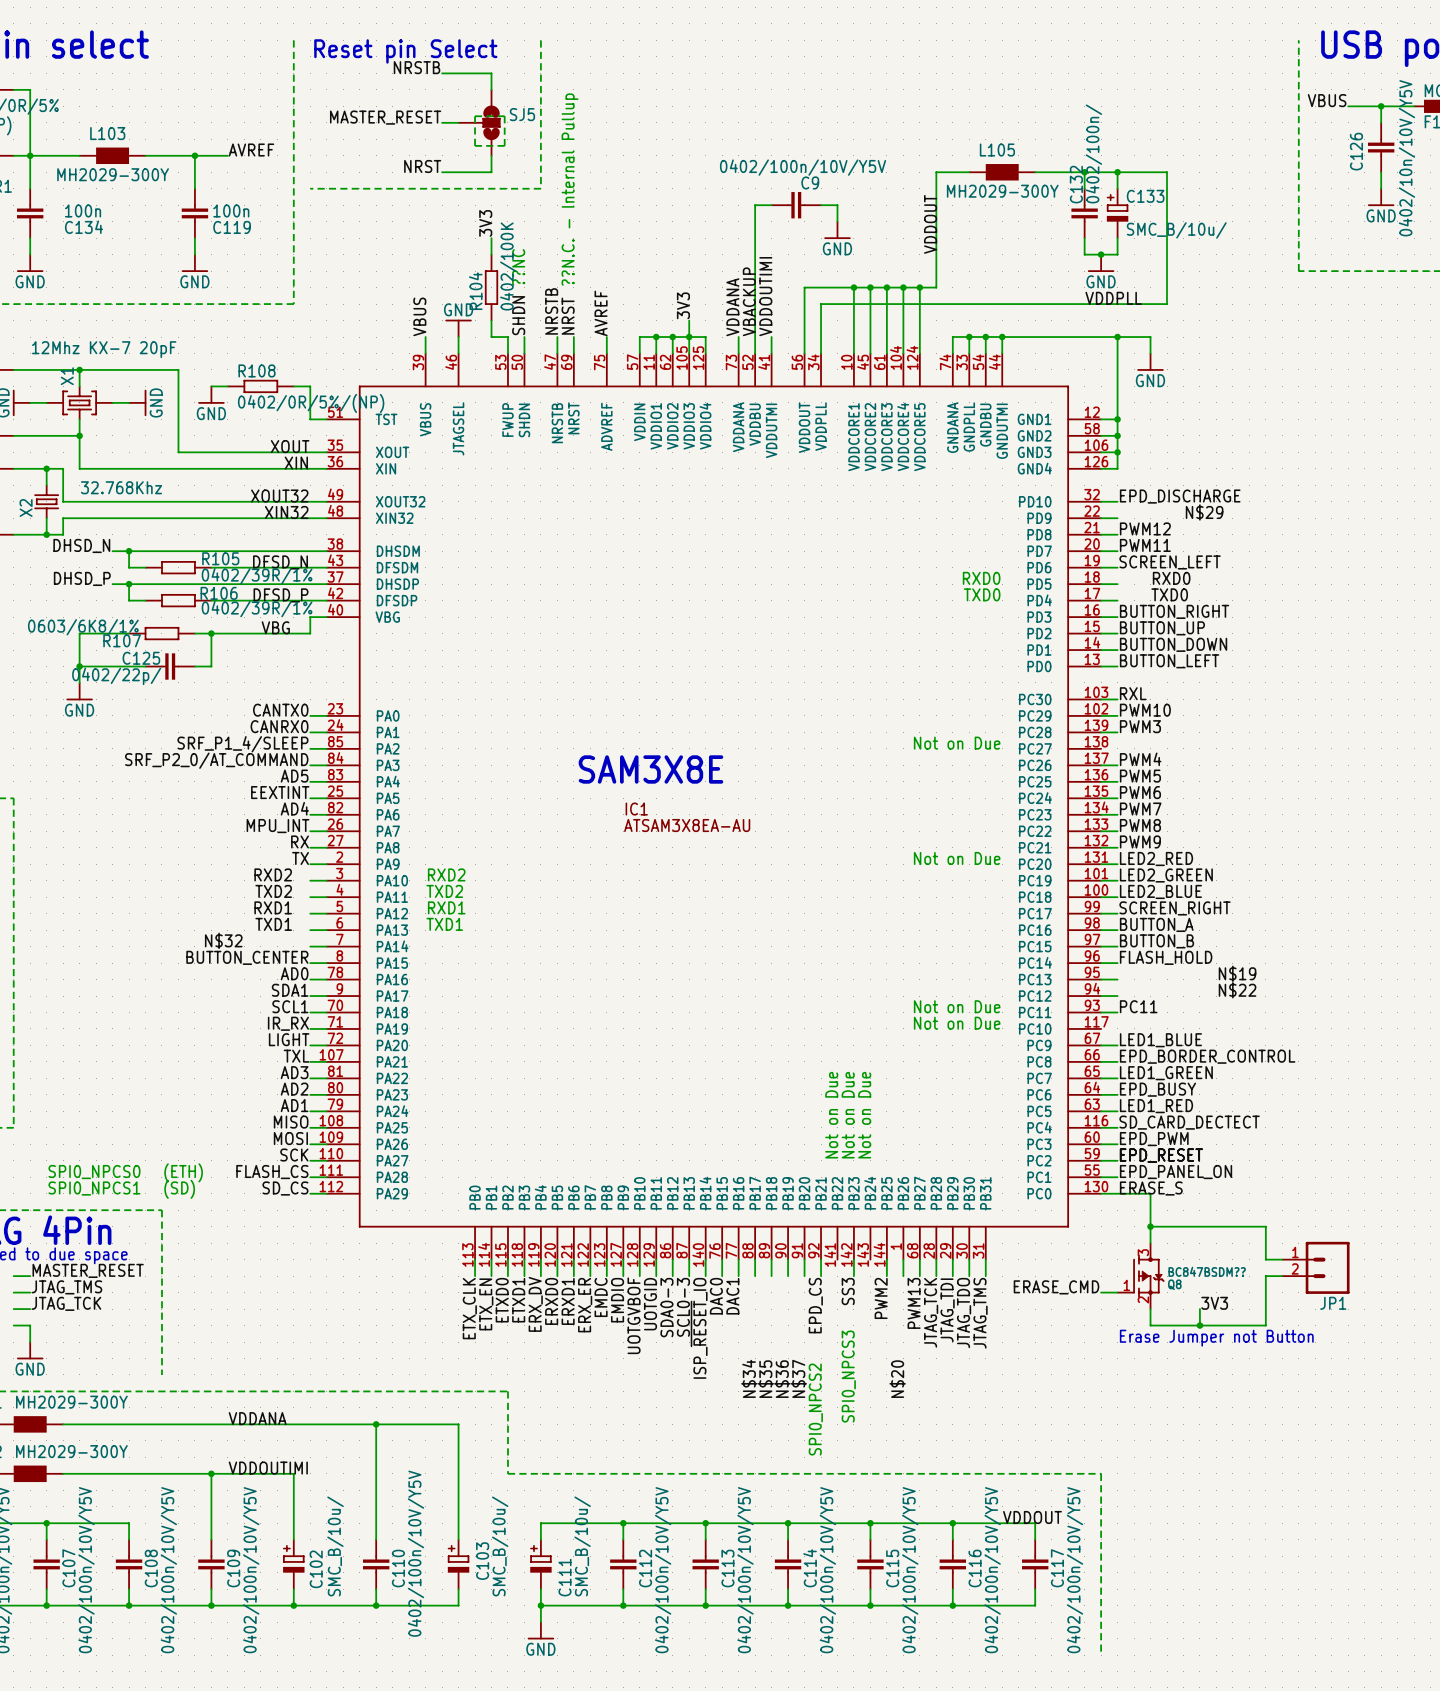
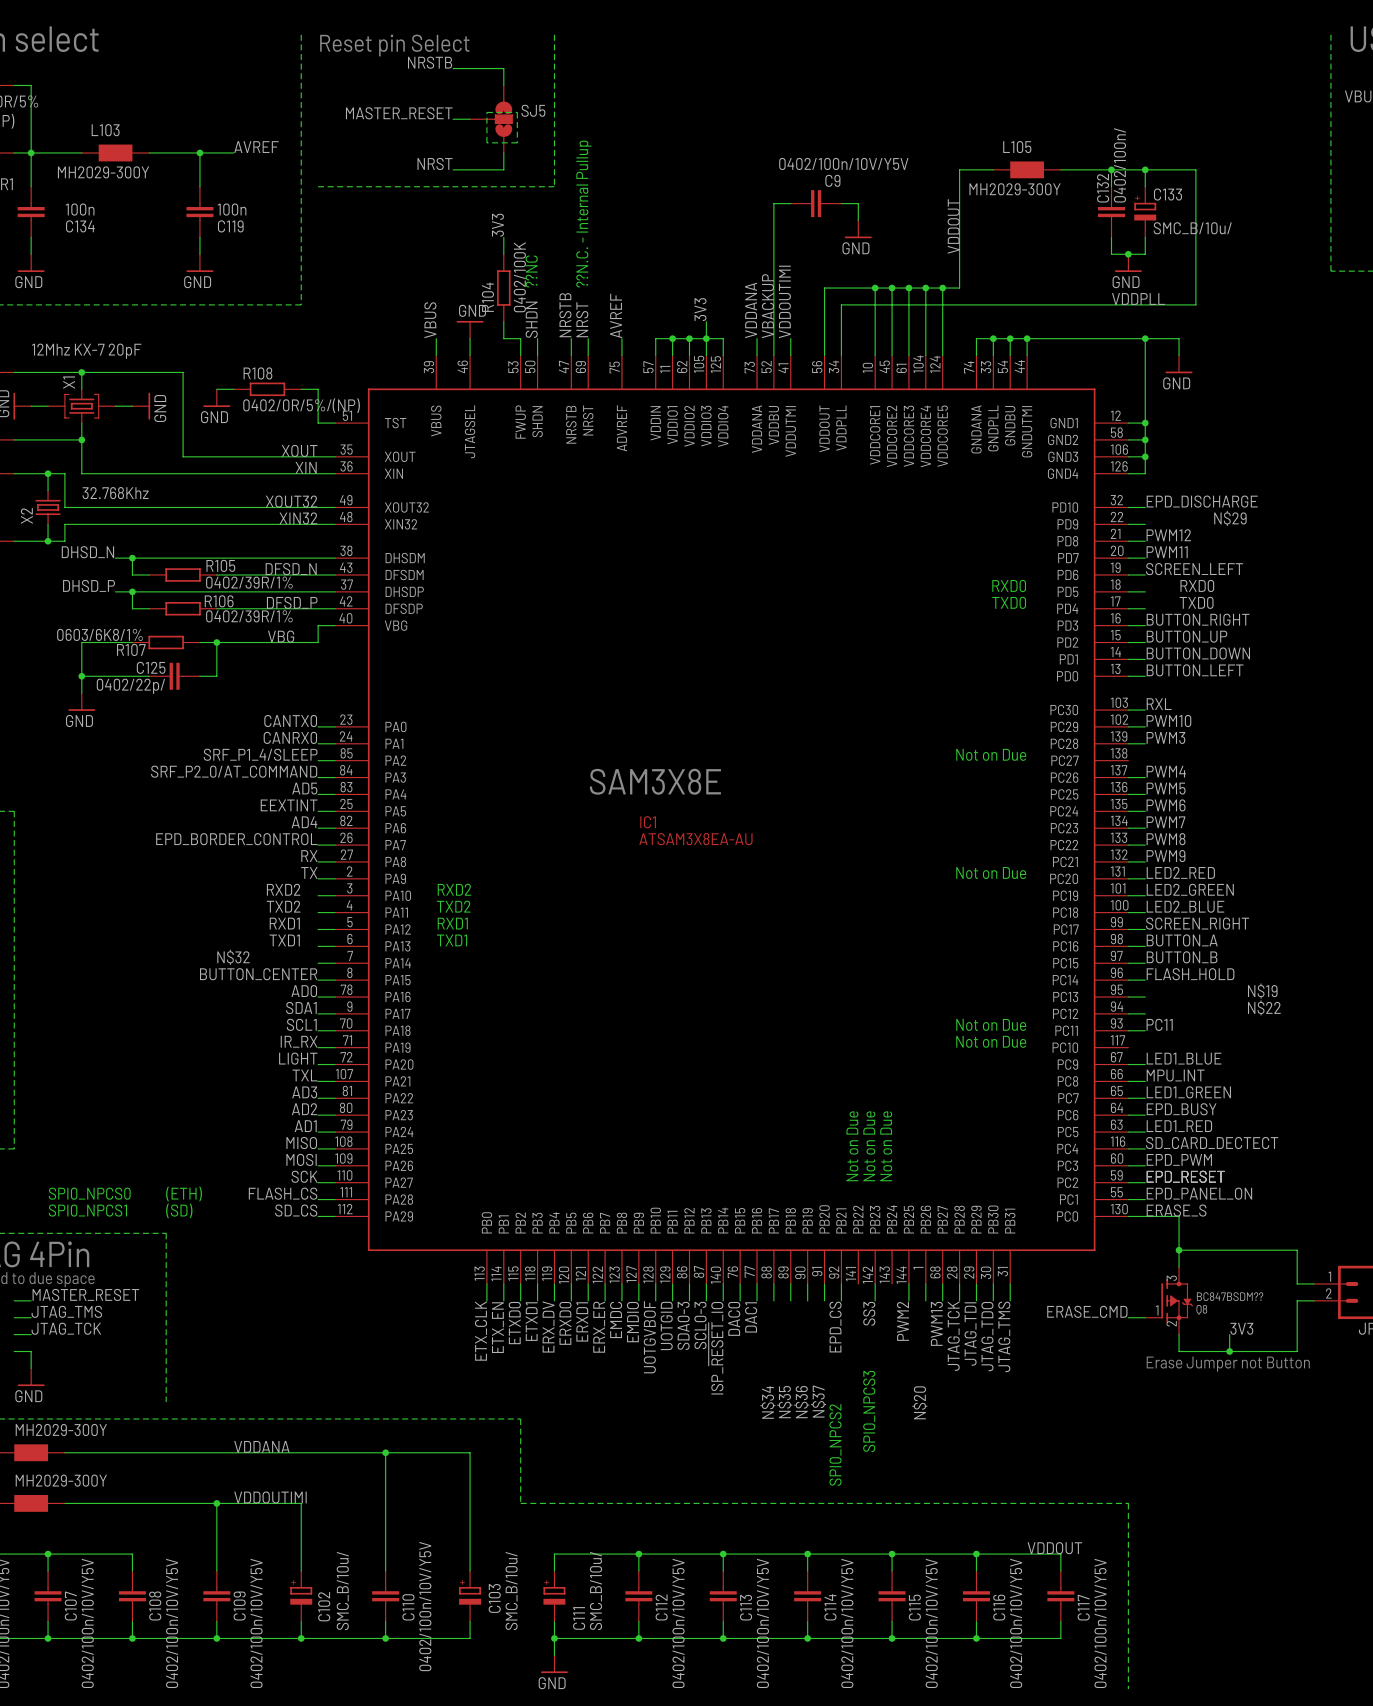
label: MPU_INT (278, 826) -> EPD_BORDER_CONTROL (236, 839)
label: EPD_BORDER_CONTROL (1207, 1056) -> MPU_INT (1175, 1075)

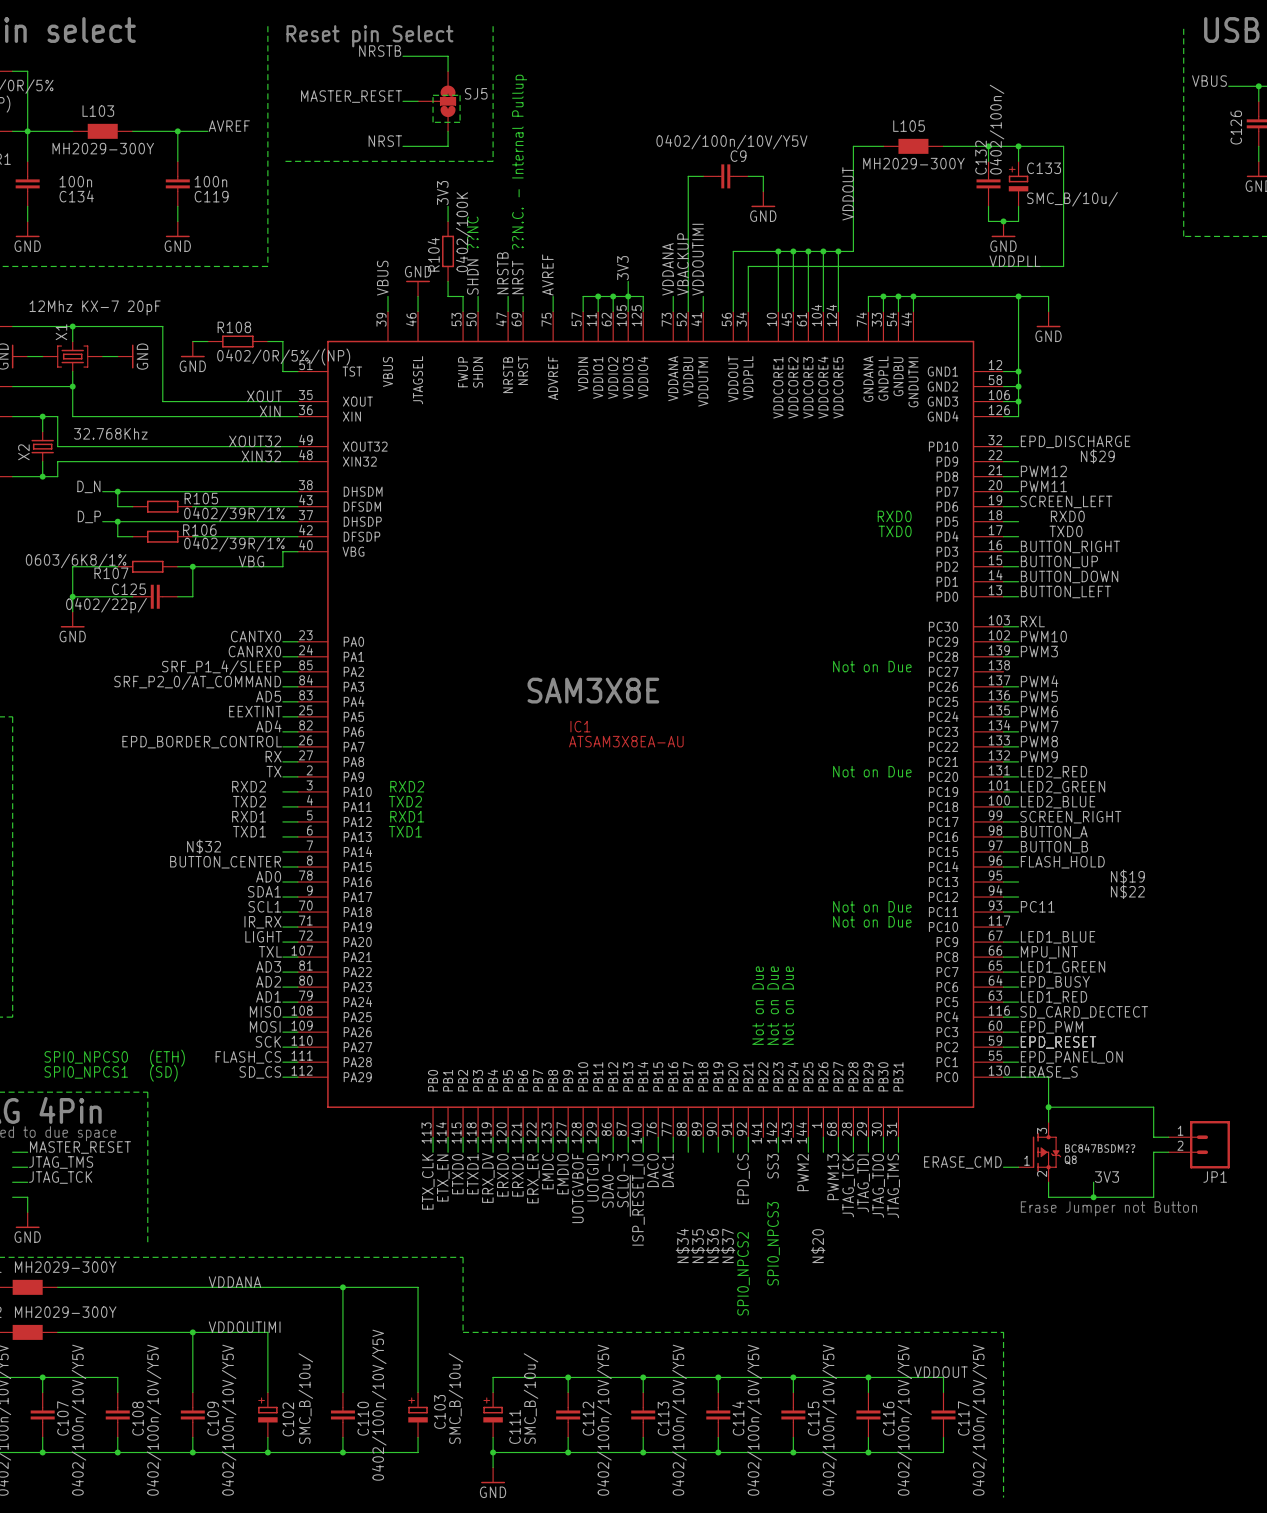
label: DHSD_N (87, 552) -> D_N (88, 486)
label: DFSD_N (291, 569) -> none
label: DHSD_P (89, 585) -> D_P (89, 516)
label: DFSD_P (292, 602) -> none

